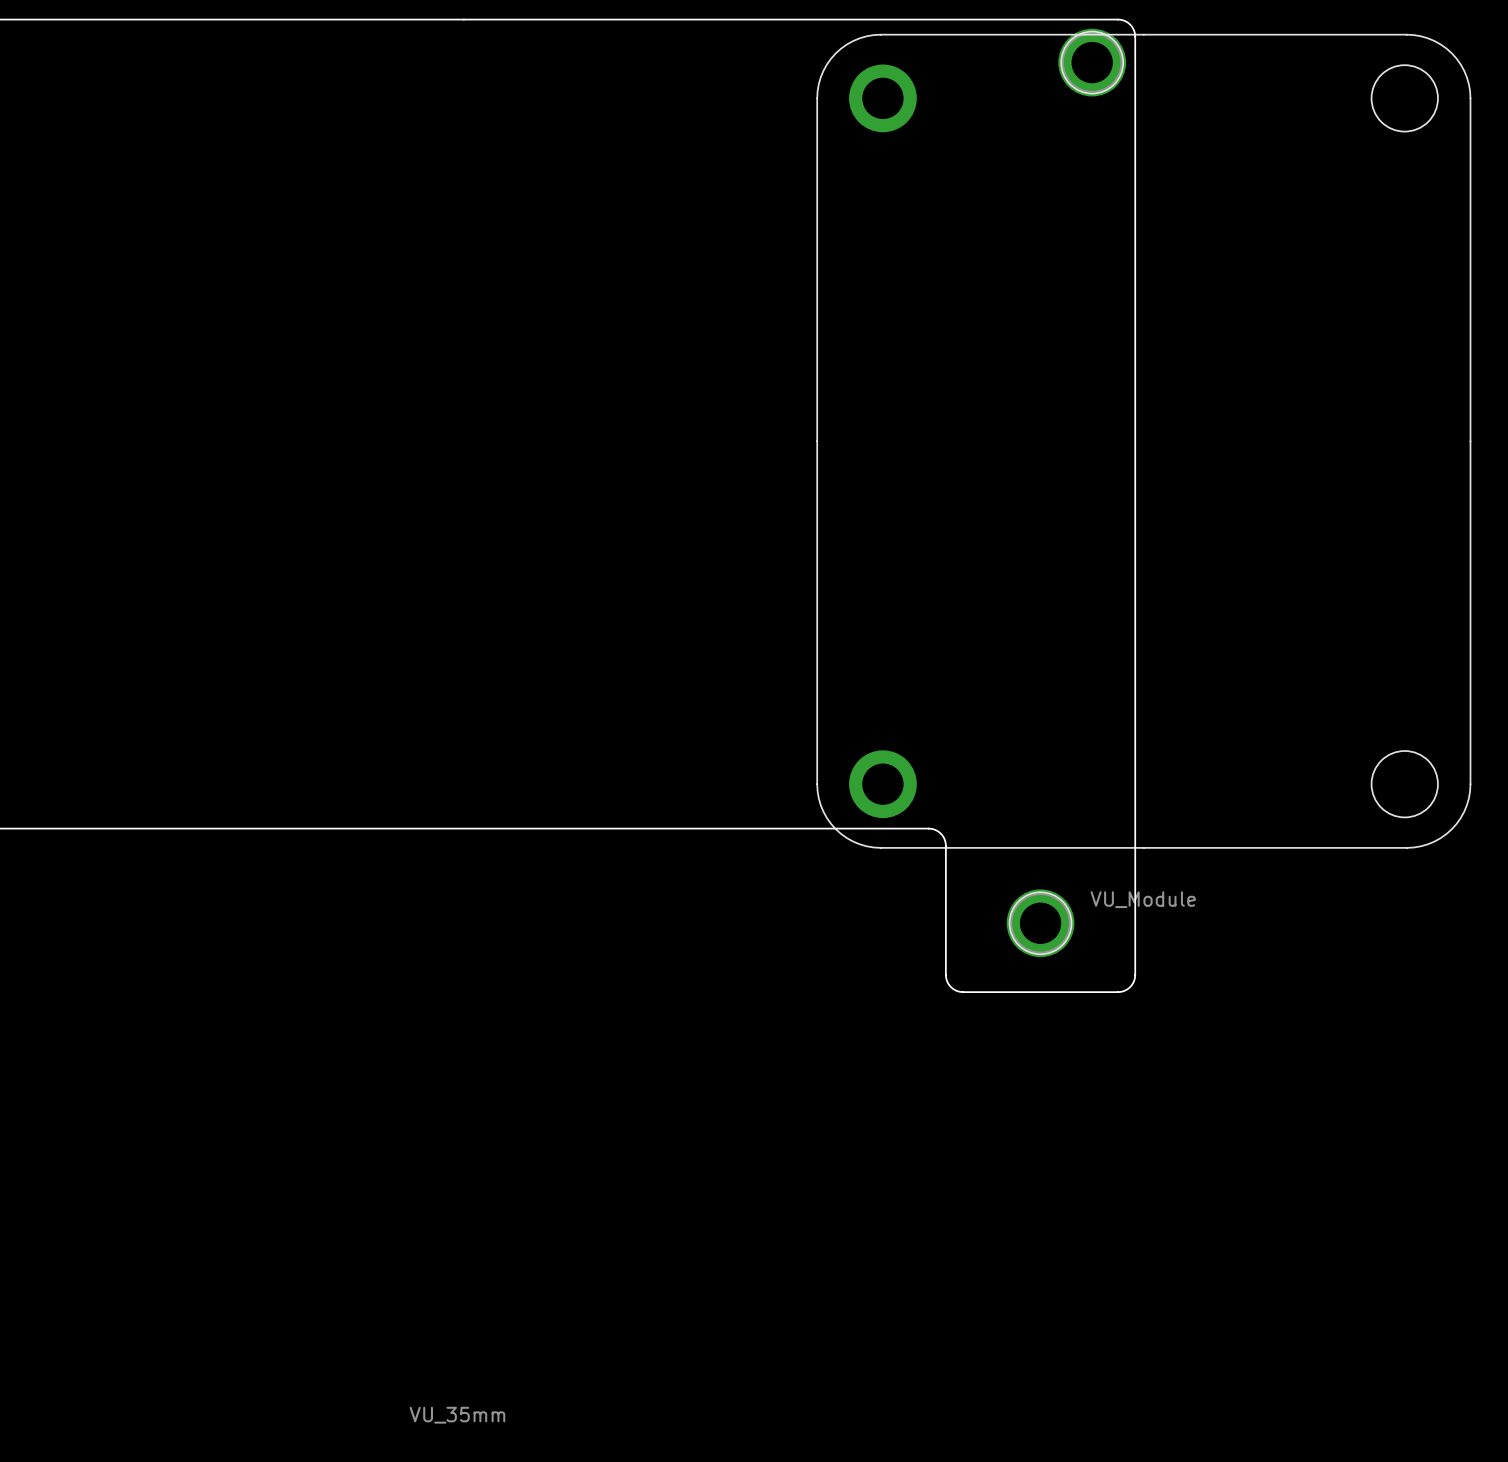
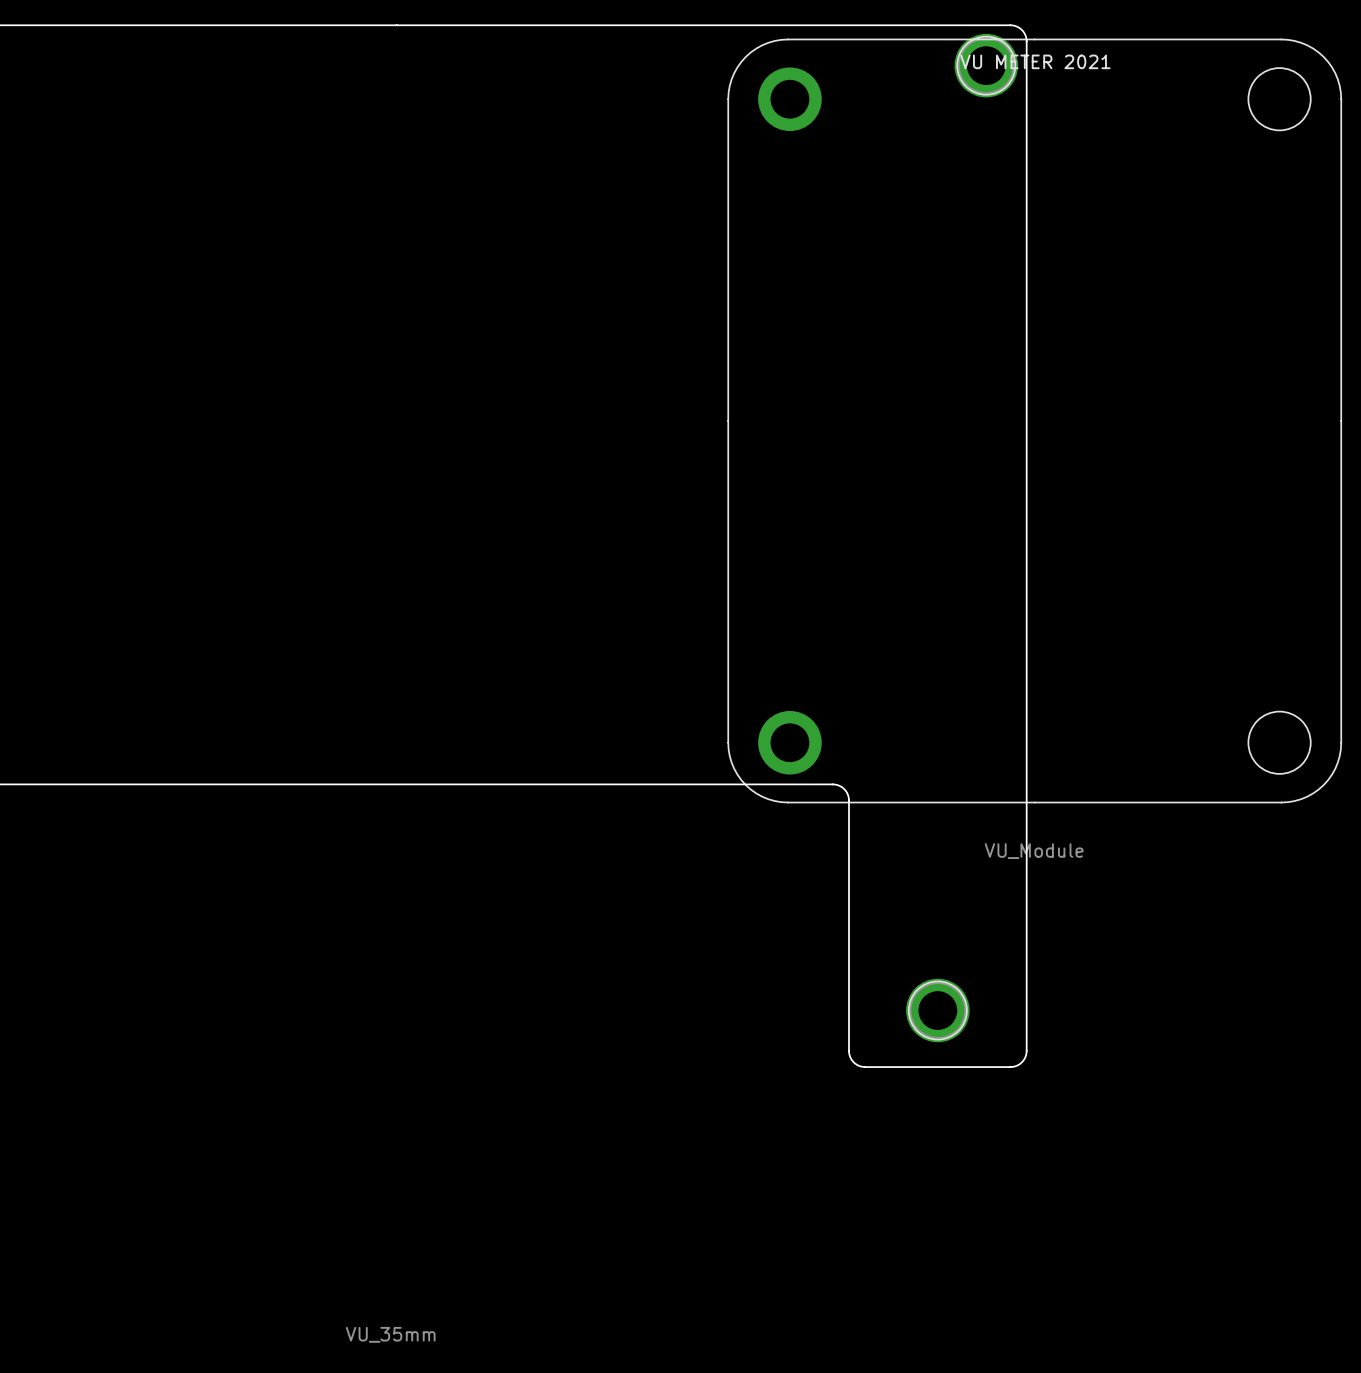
part text: none -> VU METER 2021 (1035, 61)
part position: (1040, 923) -> (937, 1010)
board edge: (945, 974) (950, 987) (963, 992) (1120, 991) (1131, 985) (1135, 974) -> (849, 921) (849, 1053) (855, 1063) (865, 1067) (1010, 1067) (1021, 1062) (1026, 1050) (1026, 921)

